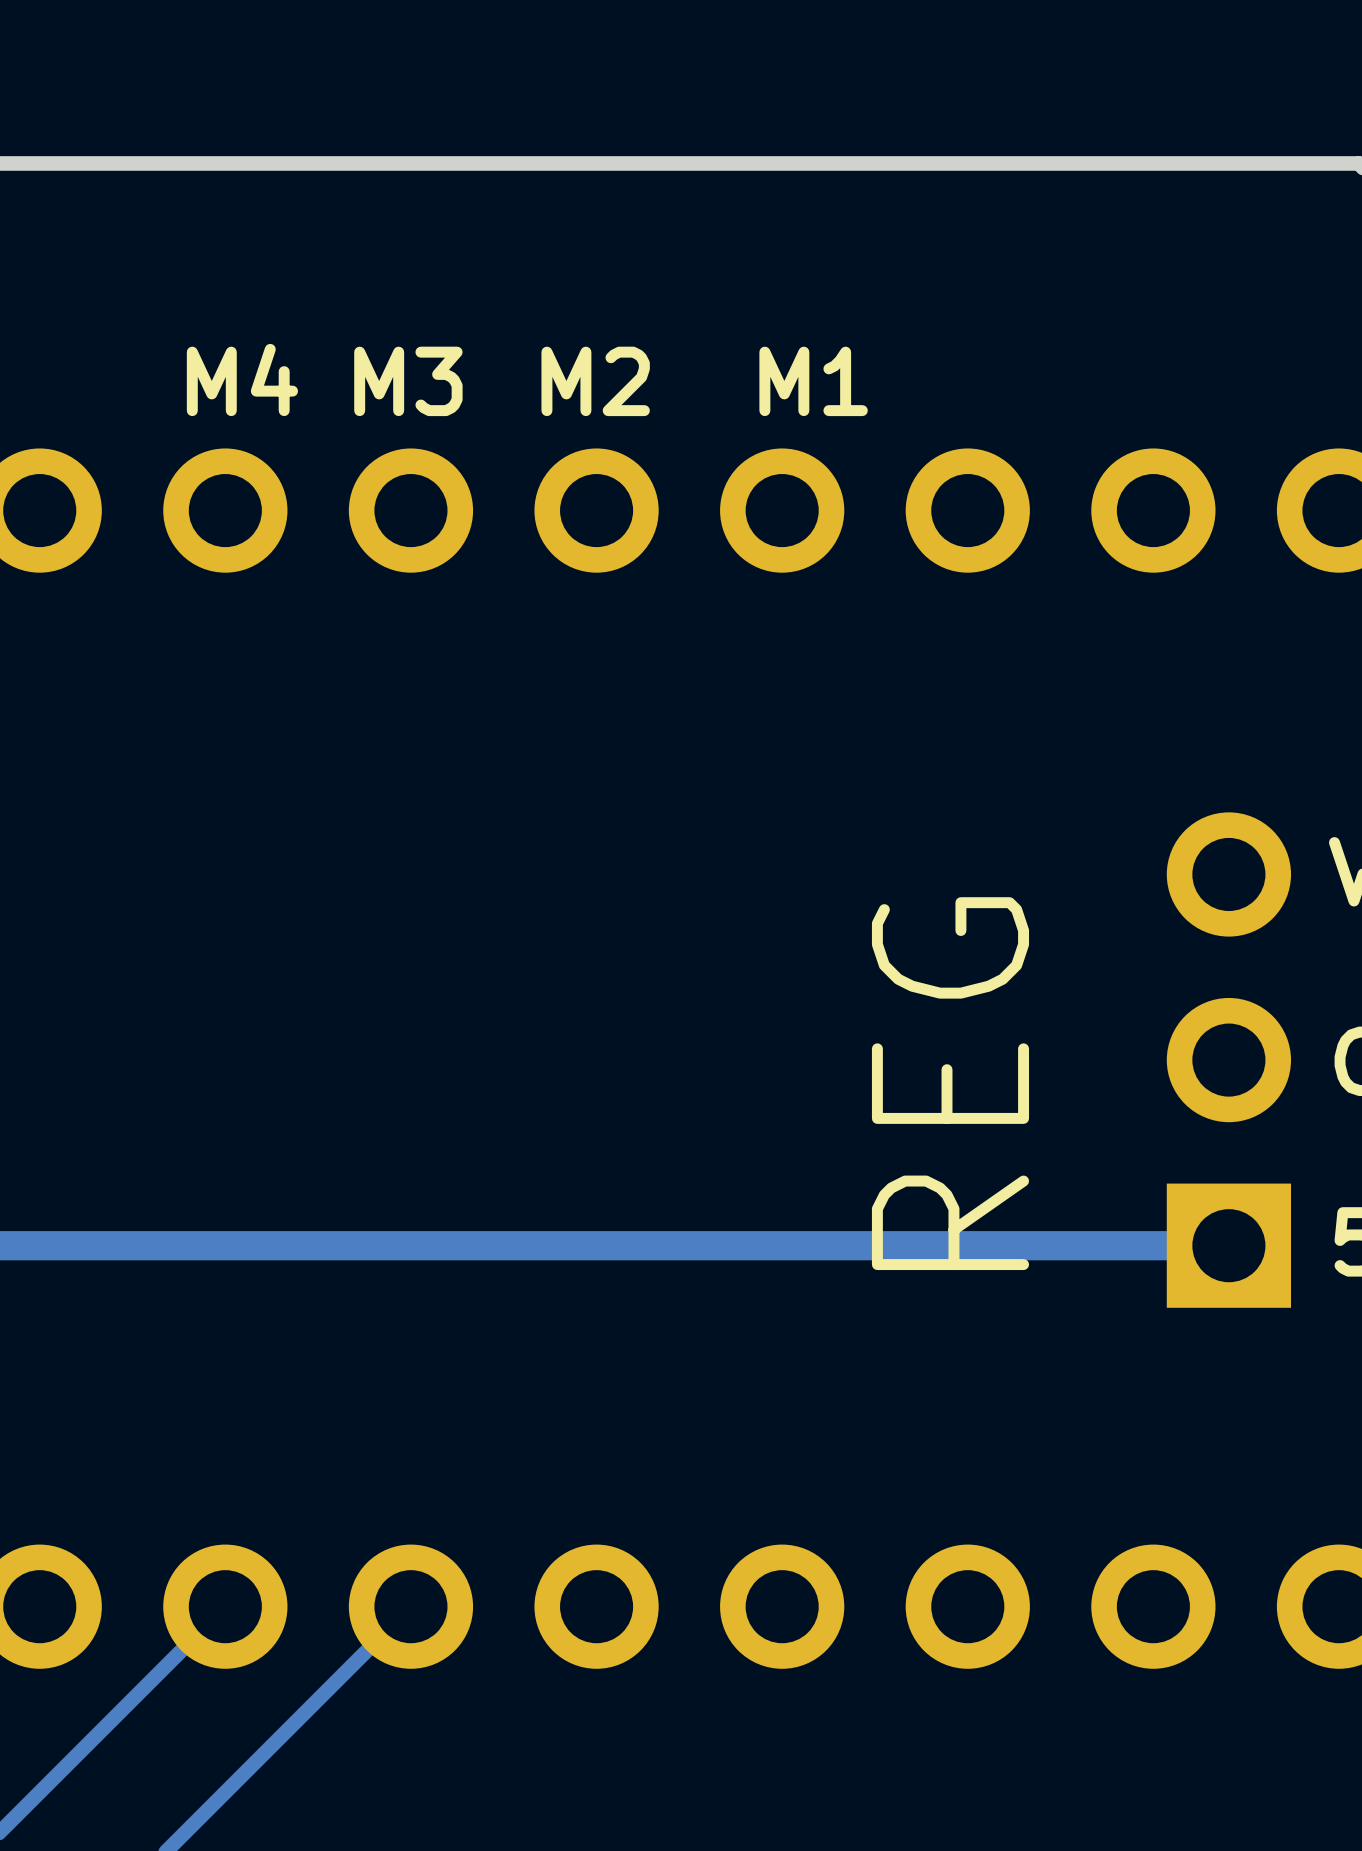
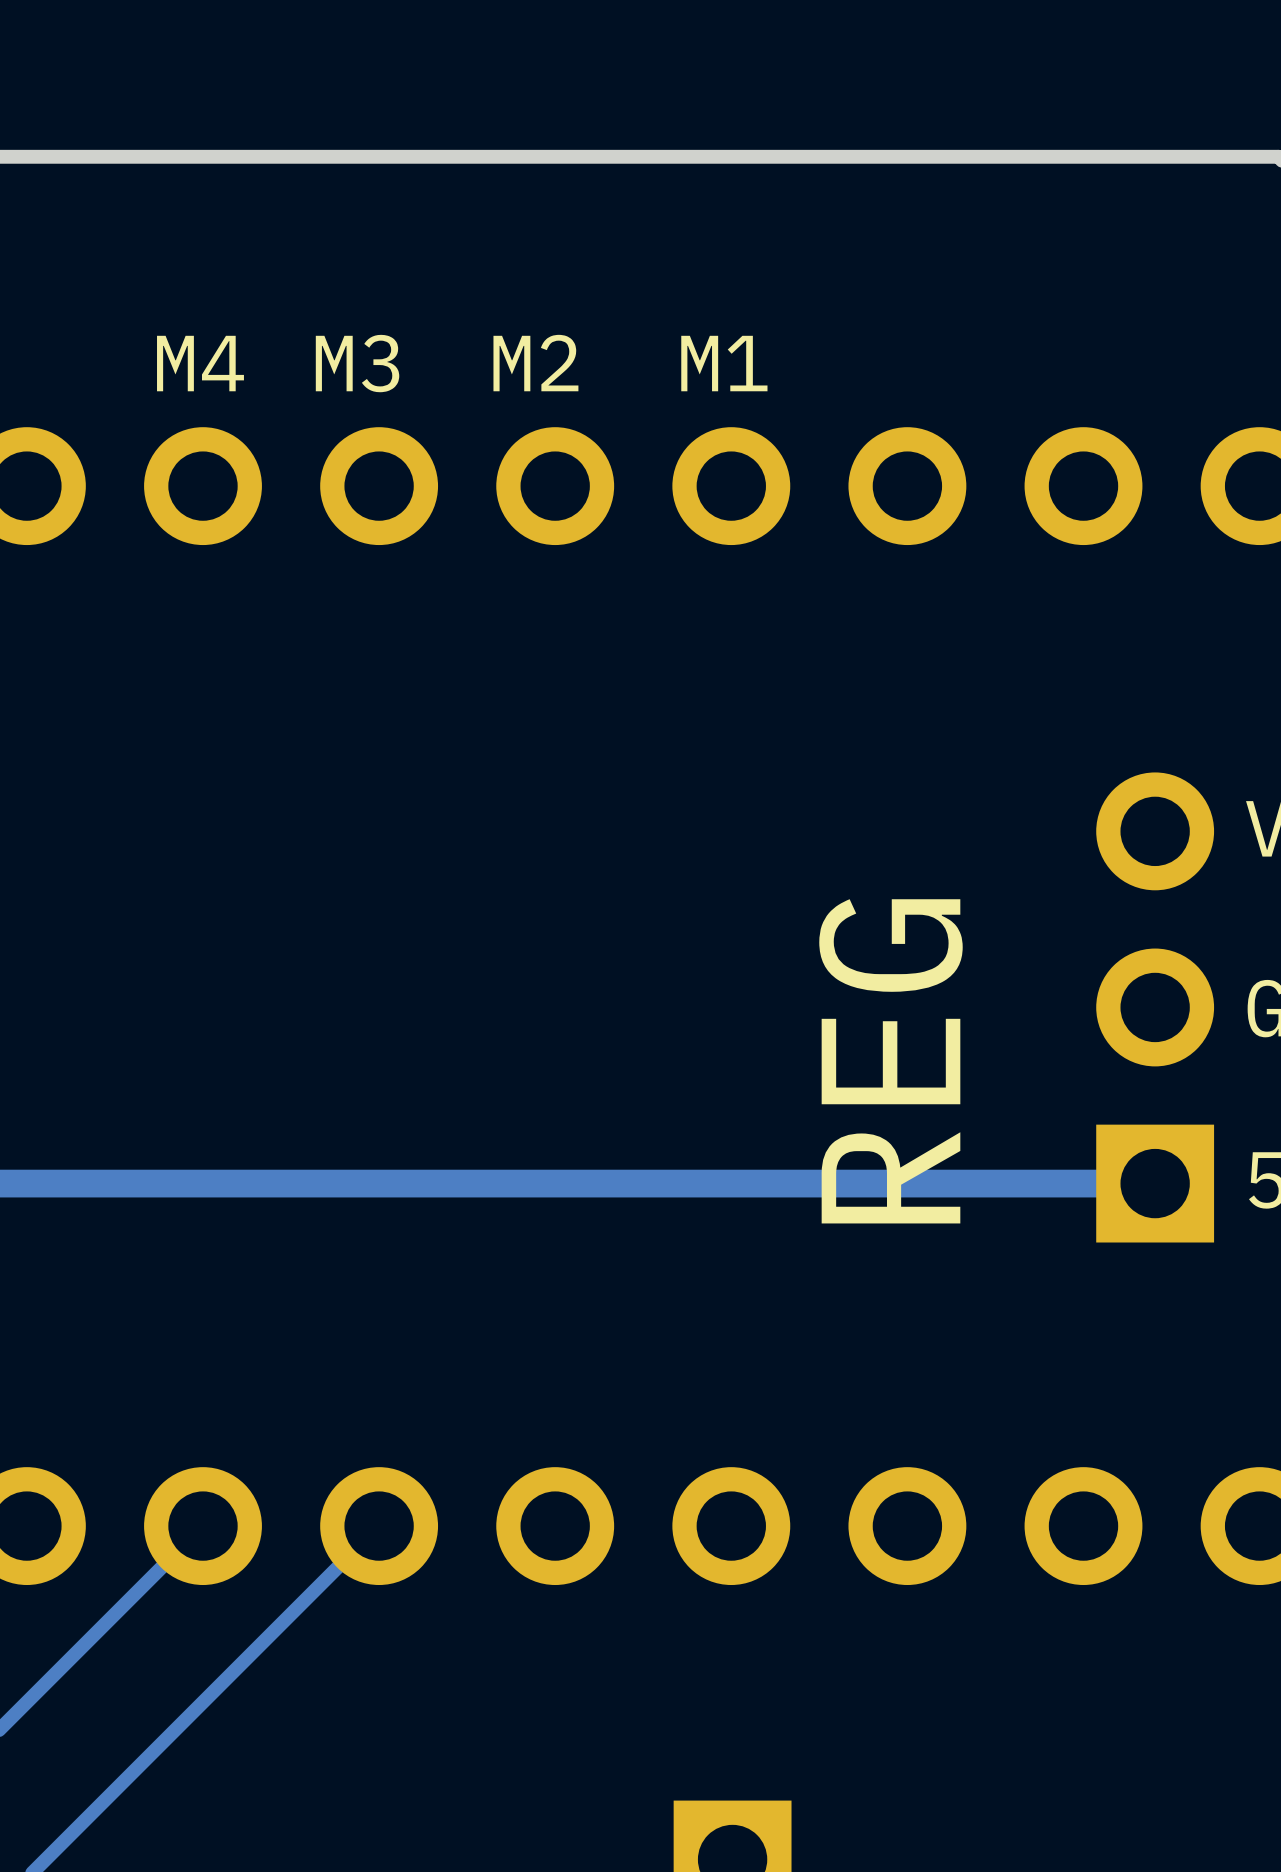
text position: M1 (813, 381) -> M1 (724, 363)

